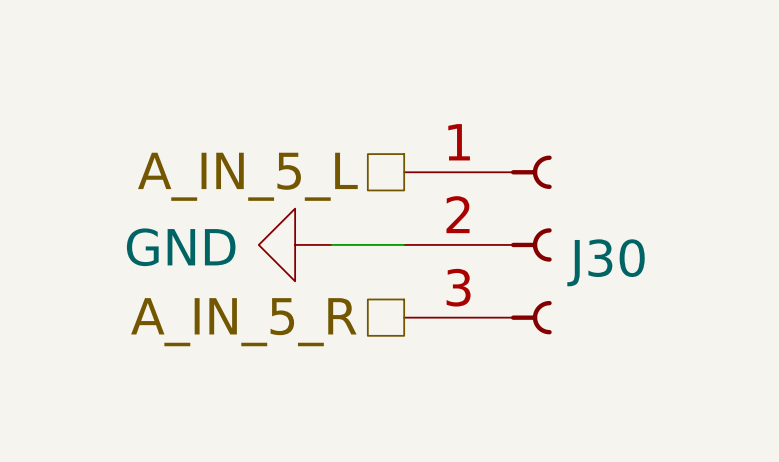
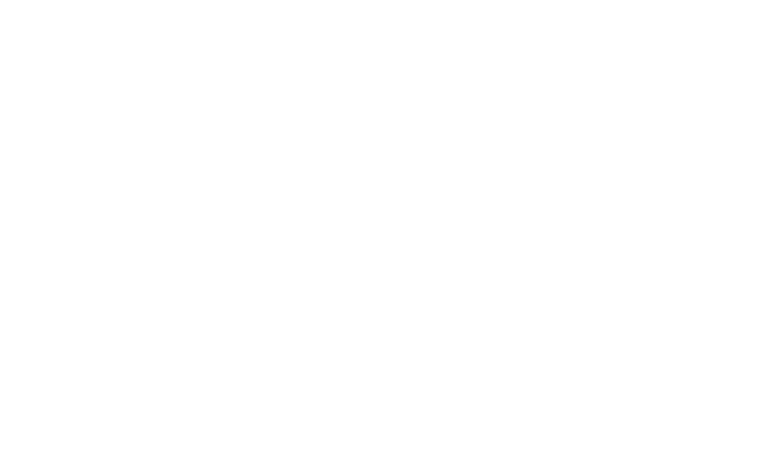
hierarchical label: A_IN_5_L (247, 176) -> none
power symbol: GND (295, 244) -> none
wire: (331, 244) (404, 244) -> none
J30: (477, 244) -> none
hierarchical label: A_IN_5_R (243, 322) -> none

